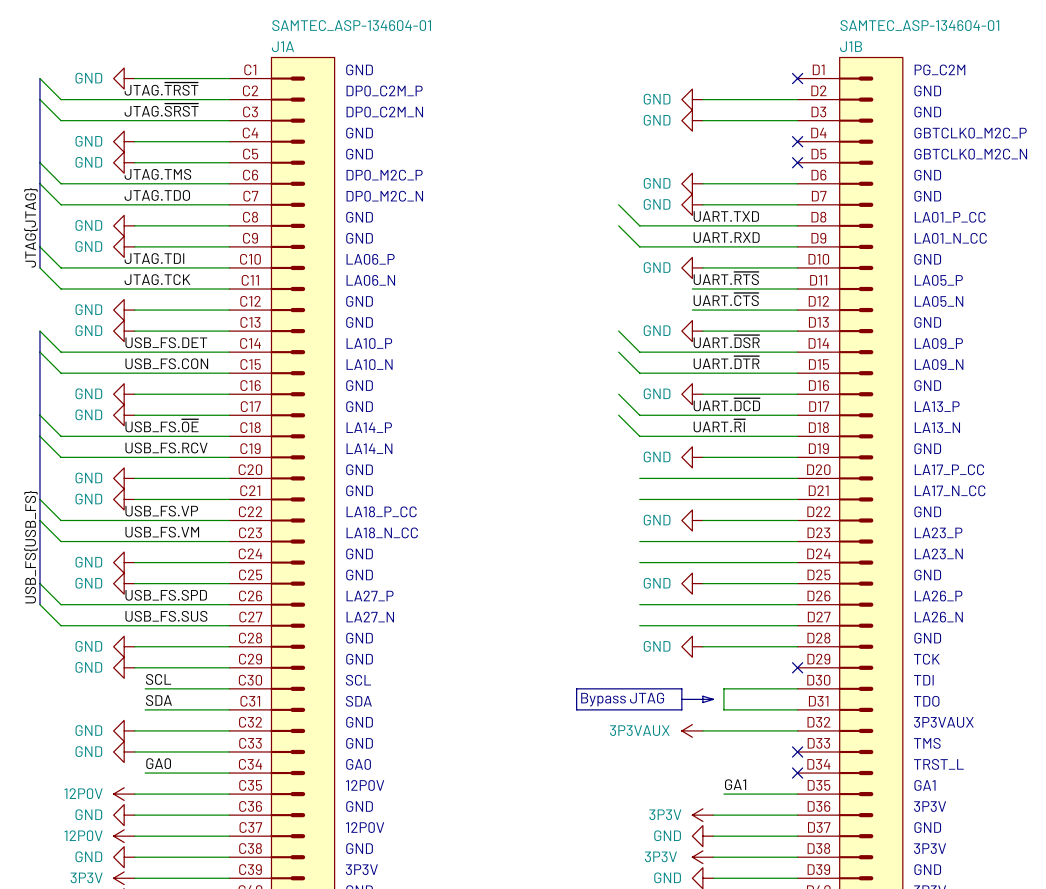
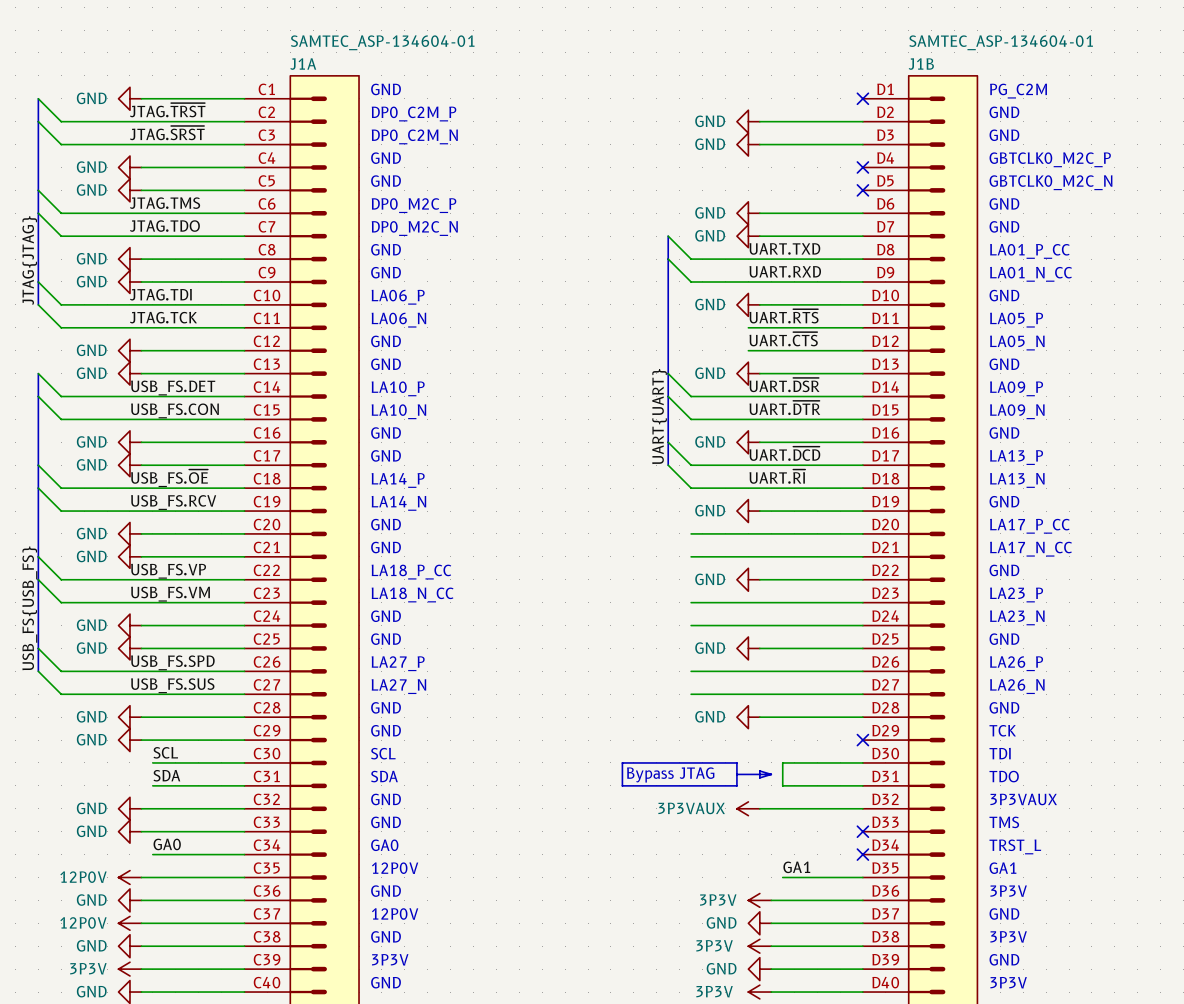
bus: none -> (668, 236) (668, 465)
label: none -> UART{UART} (659, 416)

